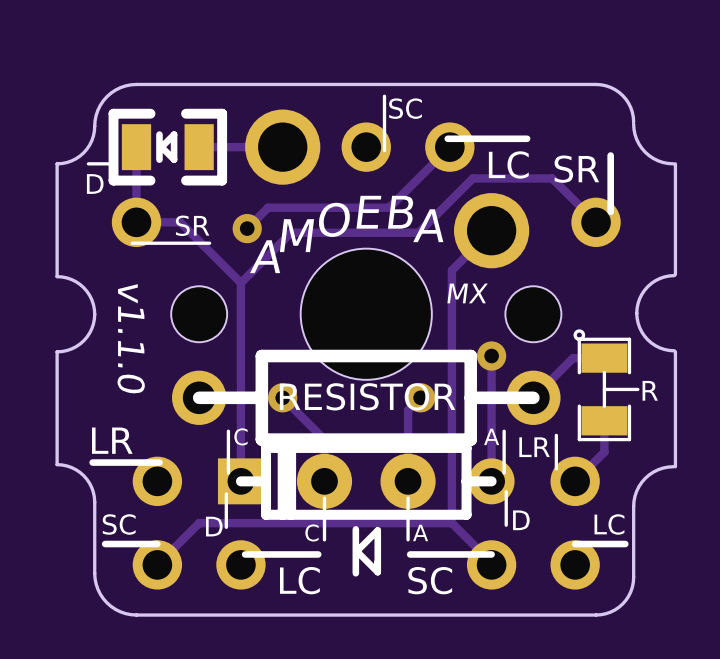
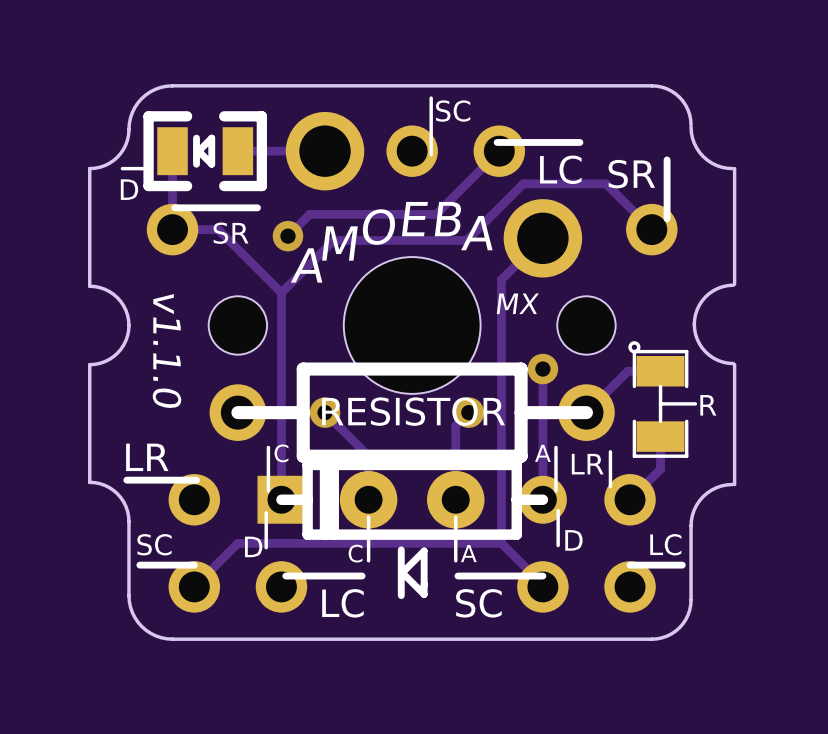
line: none -> (257, 207) (174, 207)
line: (209, 243) (132, 243) -> none

